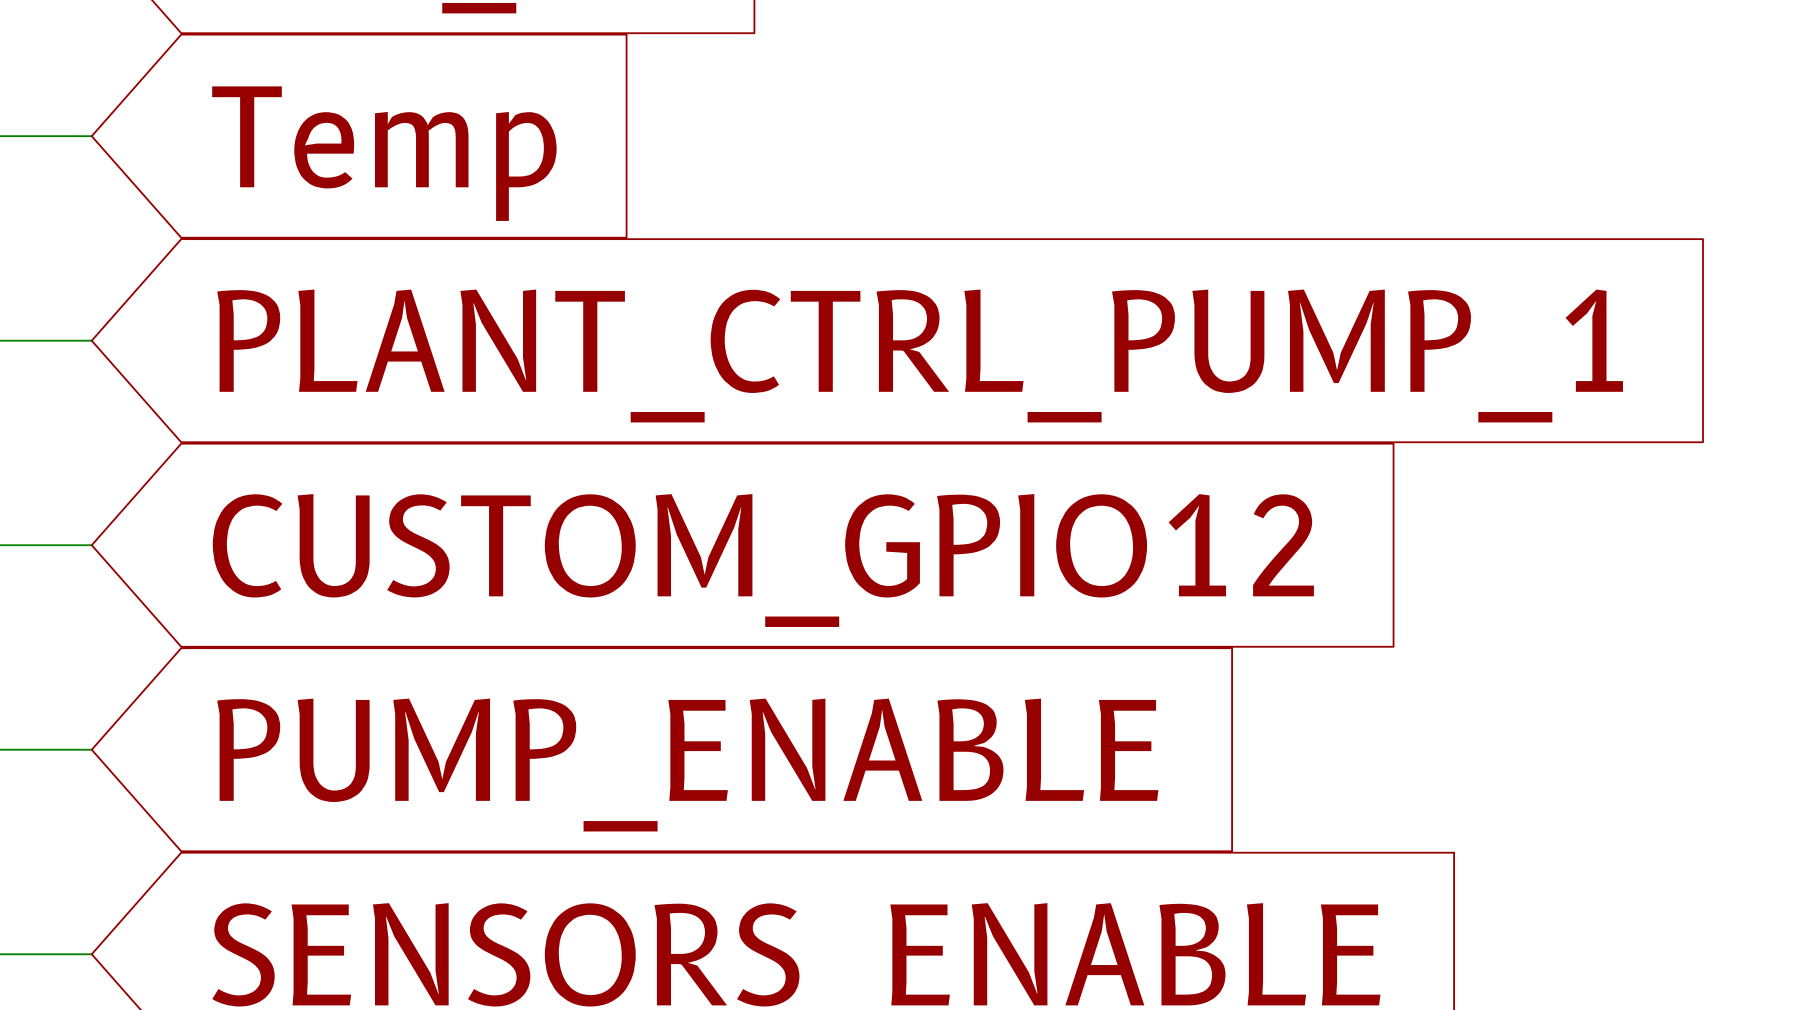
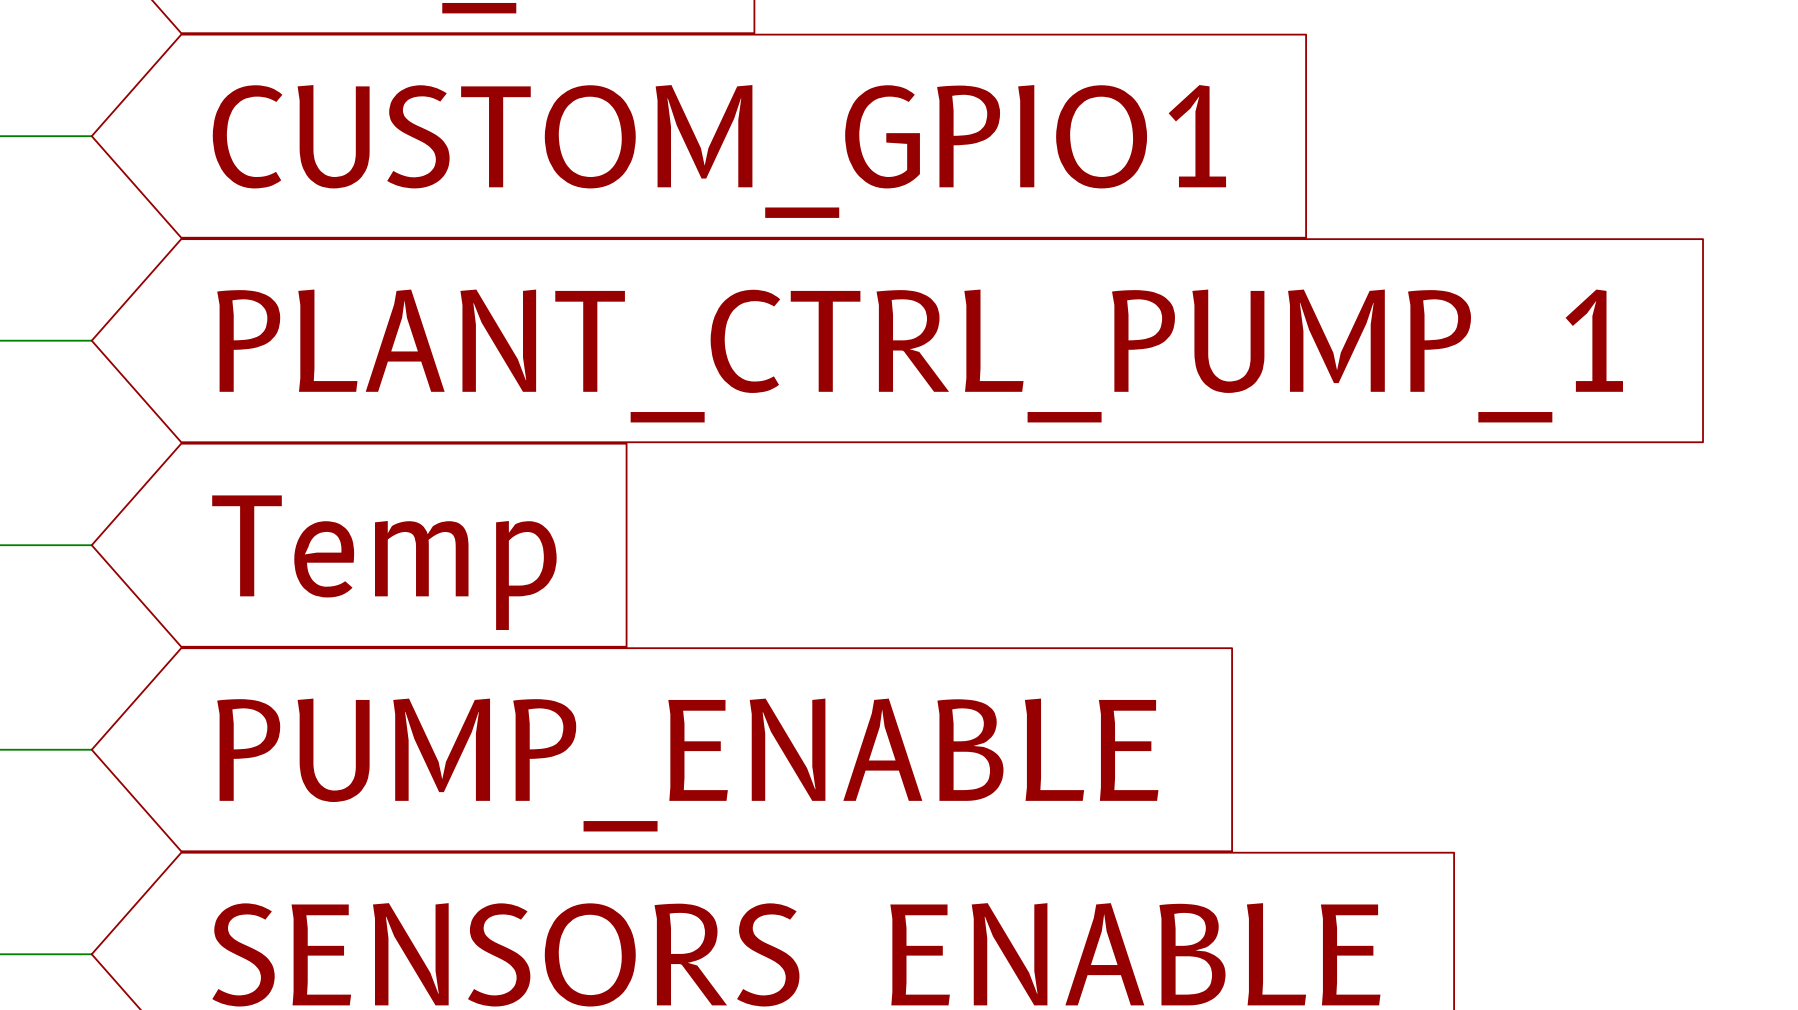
global label: Temp (384, 153) -> CUSTOM_GPIO1 (719, 151)
global label: CUSTOM_GPIO12 (763, 560) -> Temp (384, 562)

